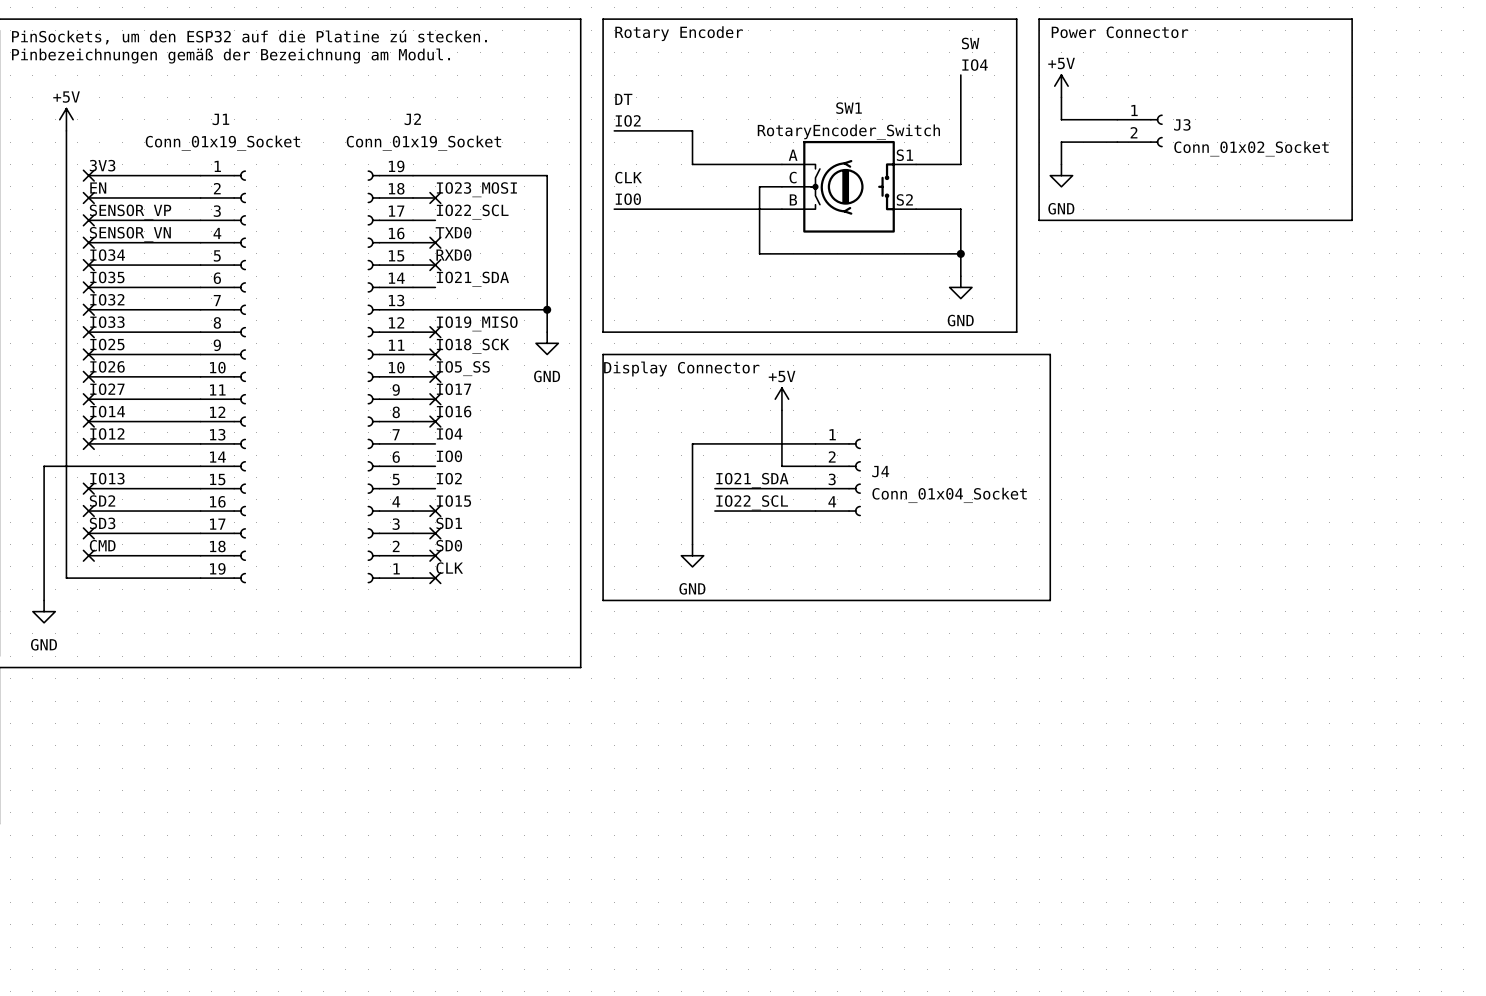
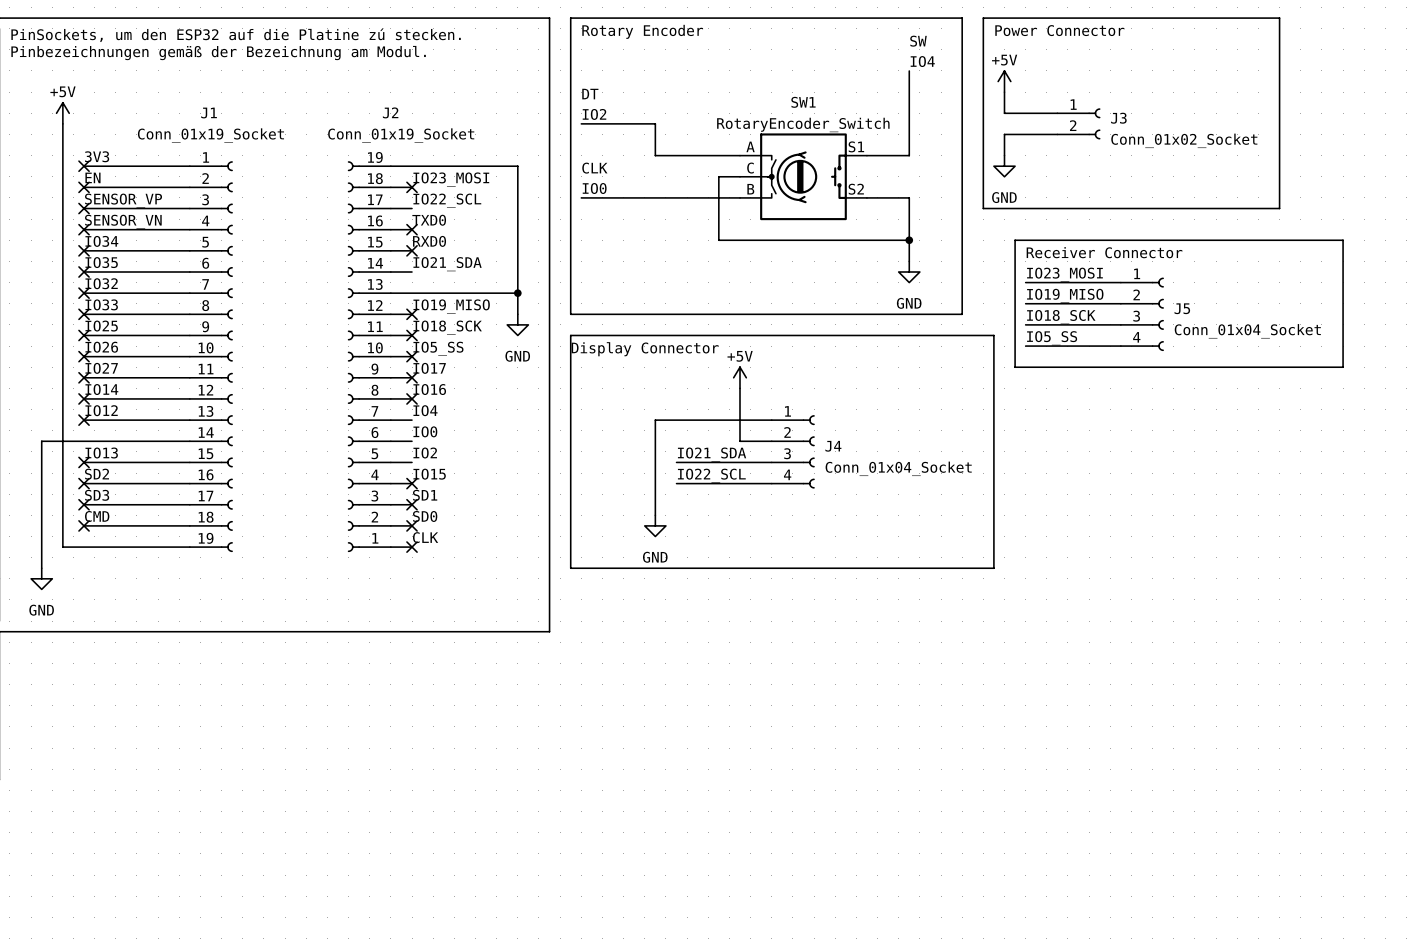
line: none -> (1015, 240) (1015, 367) (1343, 367) (1343, 240) (1015, 240)
text: none -> Receiver Connector (1104, 252)
label: none -> IO23_MOSI (1064, 274)
wire: none -> (1025, 282) (1120, 282)
label: none -> IO19_MISO (1065, 295)
wire: none -> (1025, 303) (1120, 303)
J5: none -> Conn_01x04_Socket (1142, 314)
label: none -> IO18_SCK (1061, 317)
wire: none -> (1025, 324) (1120, 324)
label: none -> IO5_SS (1052, 338)
wire: none -> (1025, 346) (1120, 346)

